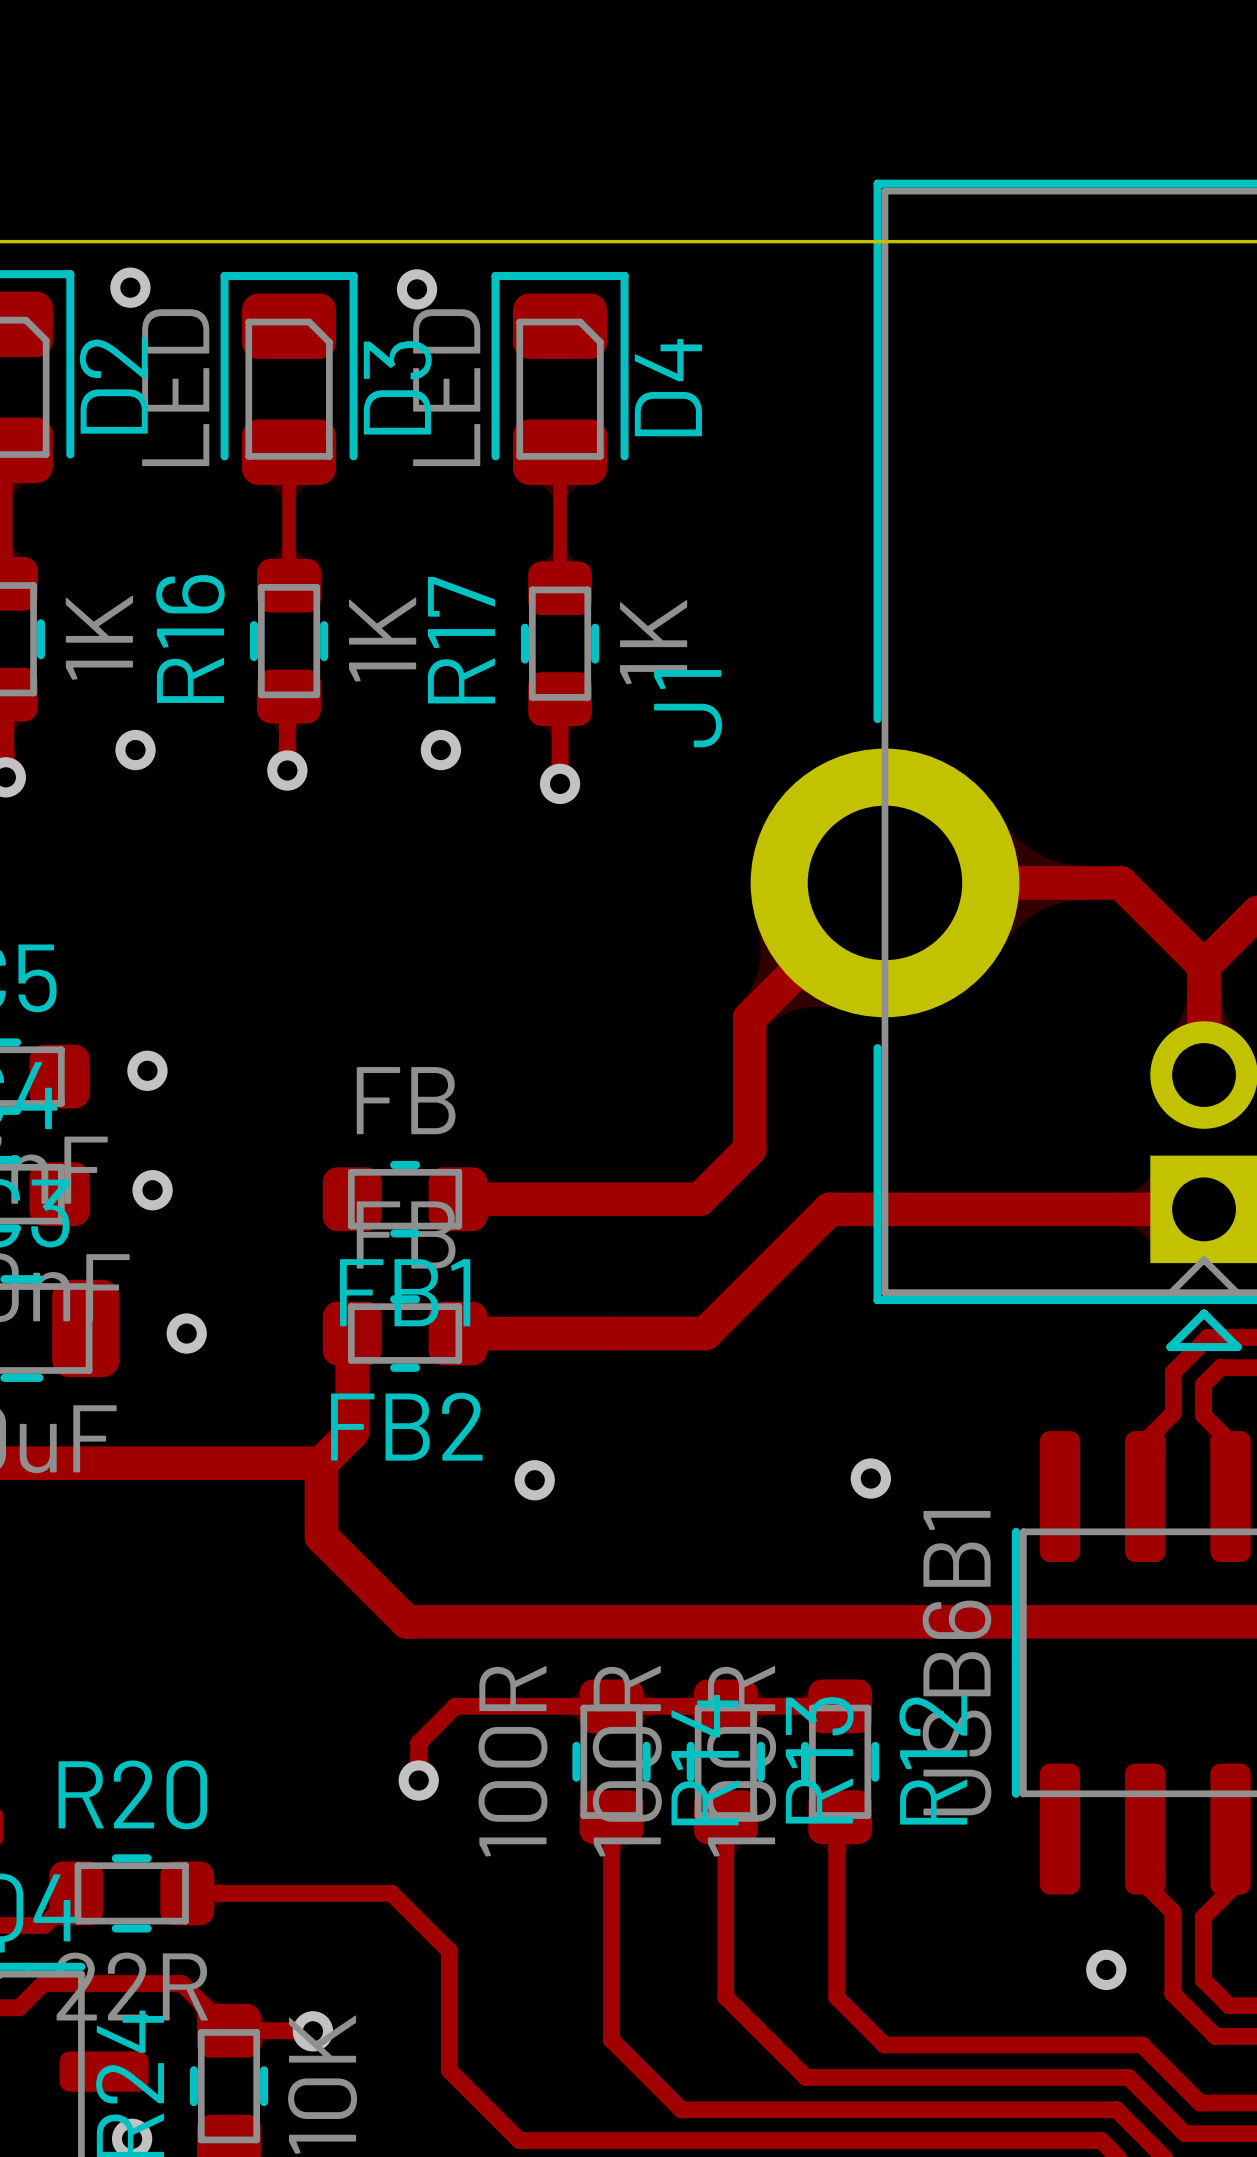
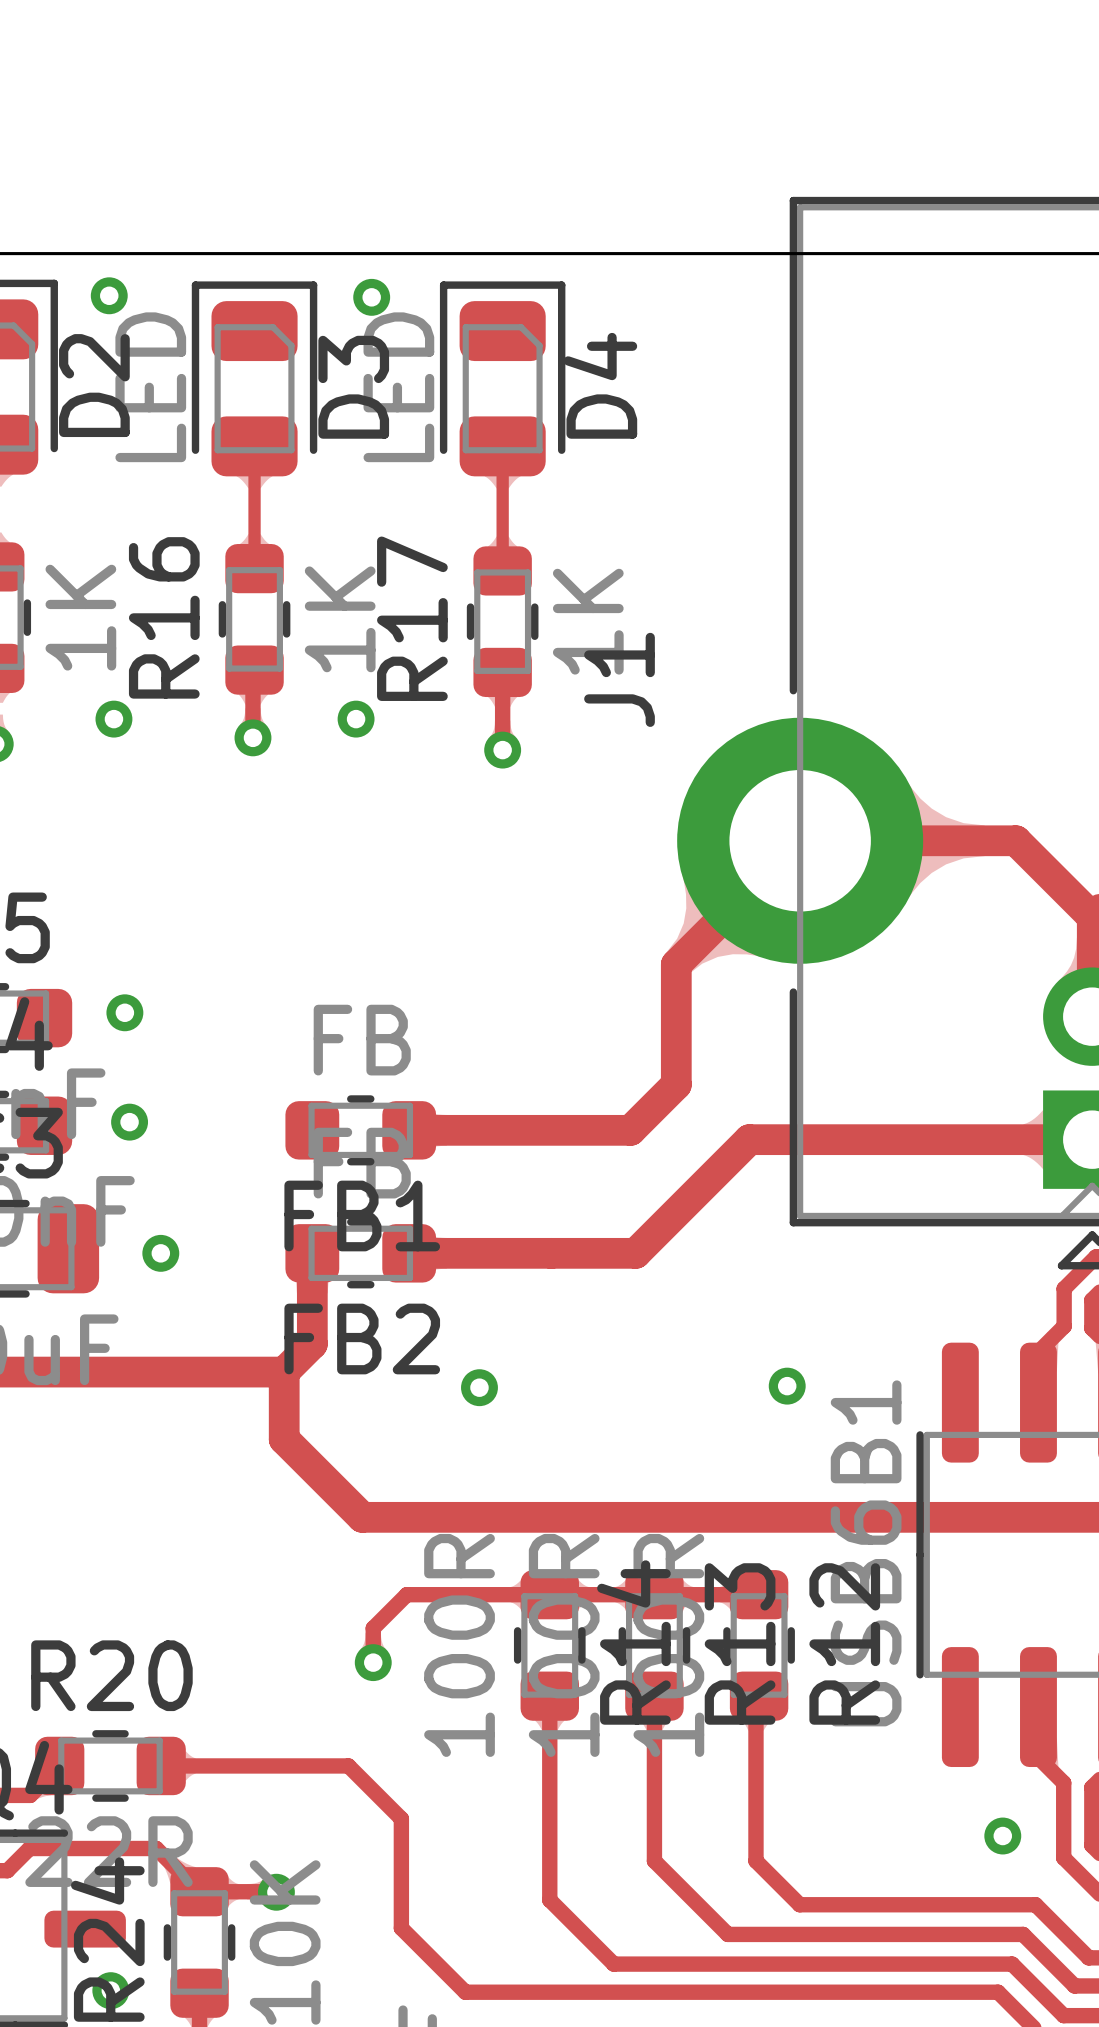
via position: (440, 750) -> (356, 719)

